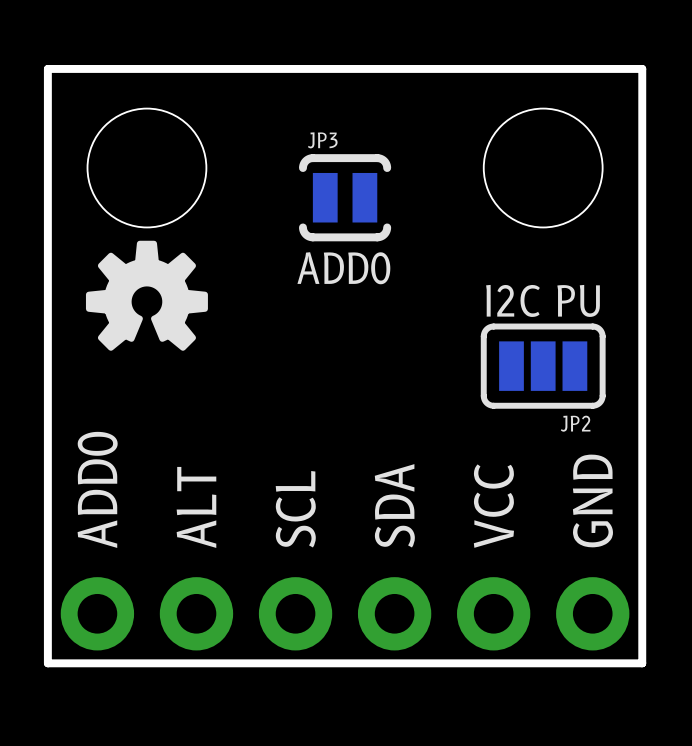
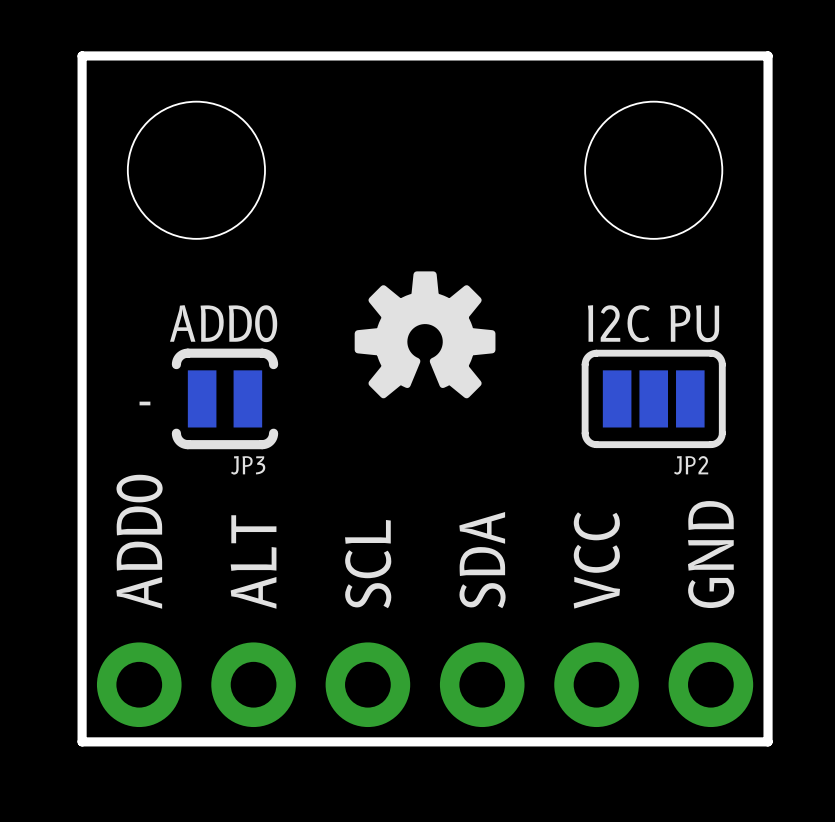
JP3 name position: JP3 (322, 140) -> JP3 (248, 465)
JP3 position: (345, 197) -> (225, 398)
text position: ADD0 (343, 268) -> ADD0 (223, 323)
drawing position: (146, 295) -> (425, 334)
text: none -> - (144, 403)

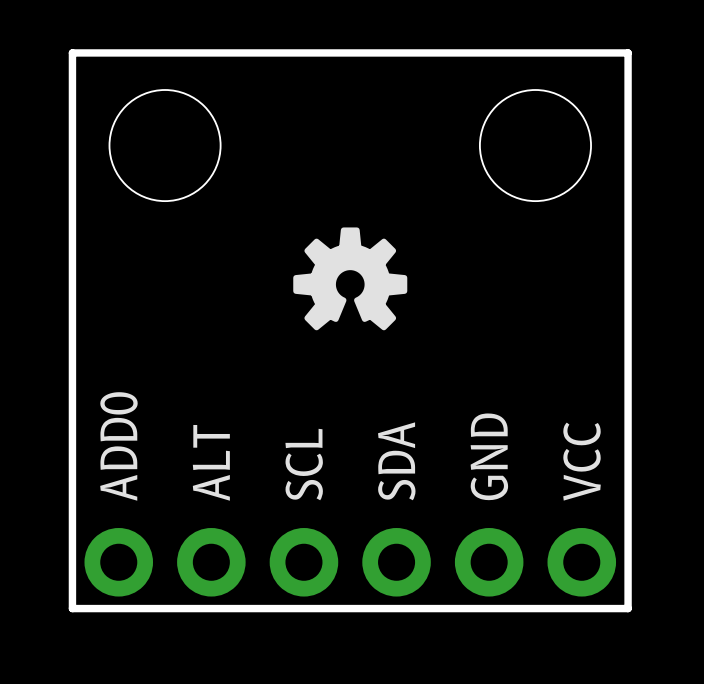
text: ADD0 (223, 323) -> none
text: I2C PU (653, 323) -> none
JP3: (225, 398) -> none
JP2: (653, 398) -> none
text: - (144, 403) -> none
text: GND (711, 554) -> VCC (582, 461)
text: VCC (596, 560) -> GND (489, 456)

